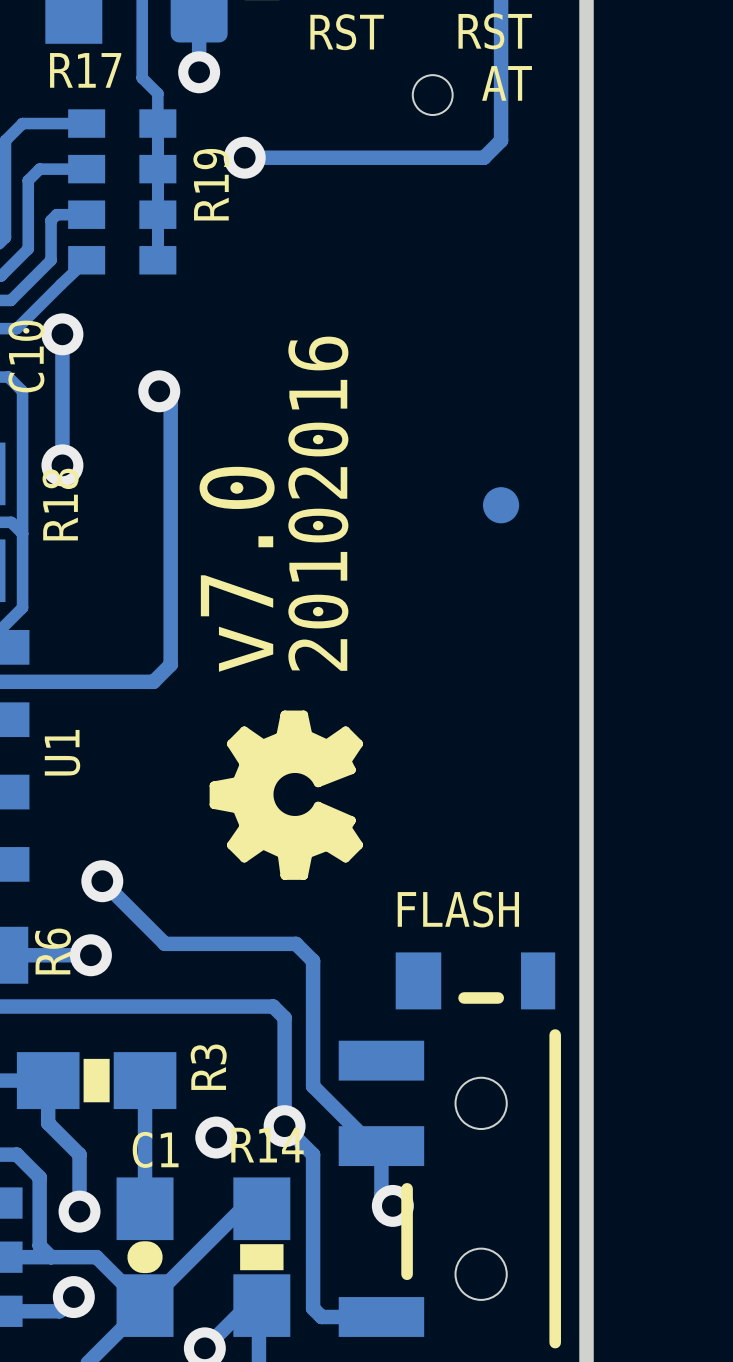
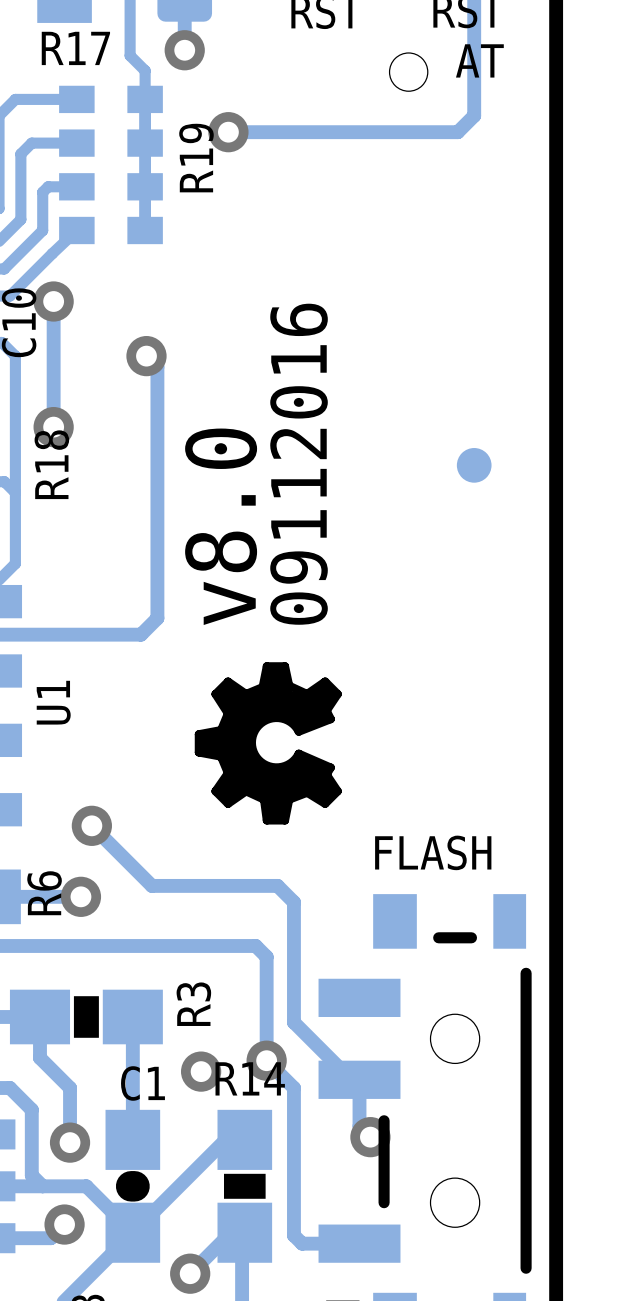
text: 20102016 (318, 503) -> 09112016 (299, 464)
text: v7.0 (237, 569) -> v8.0 (221, 526)

